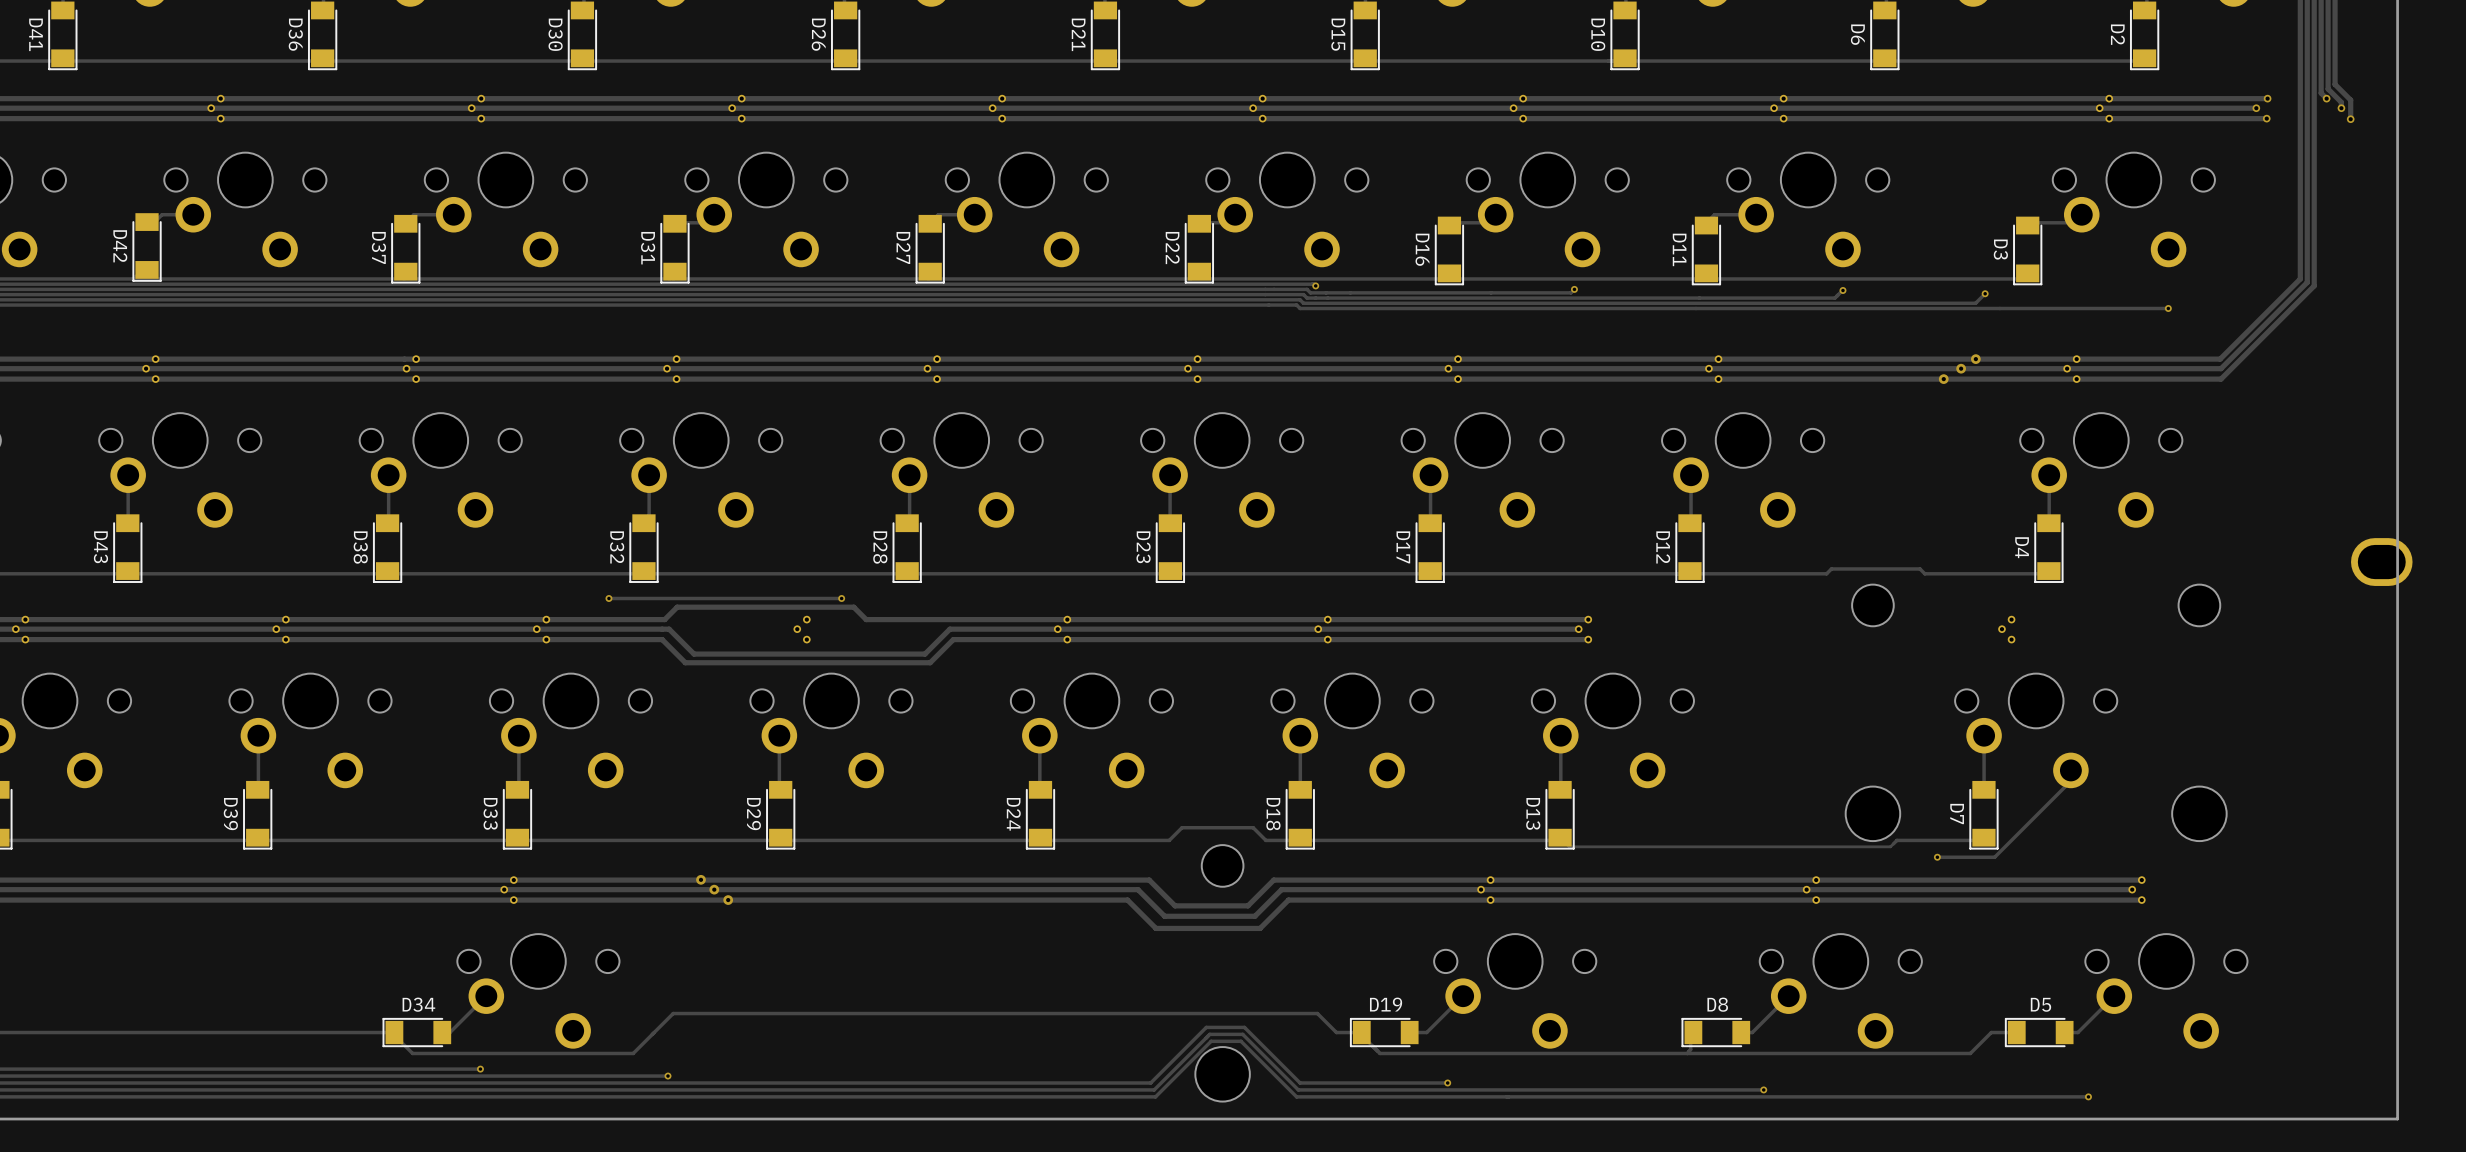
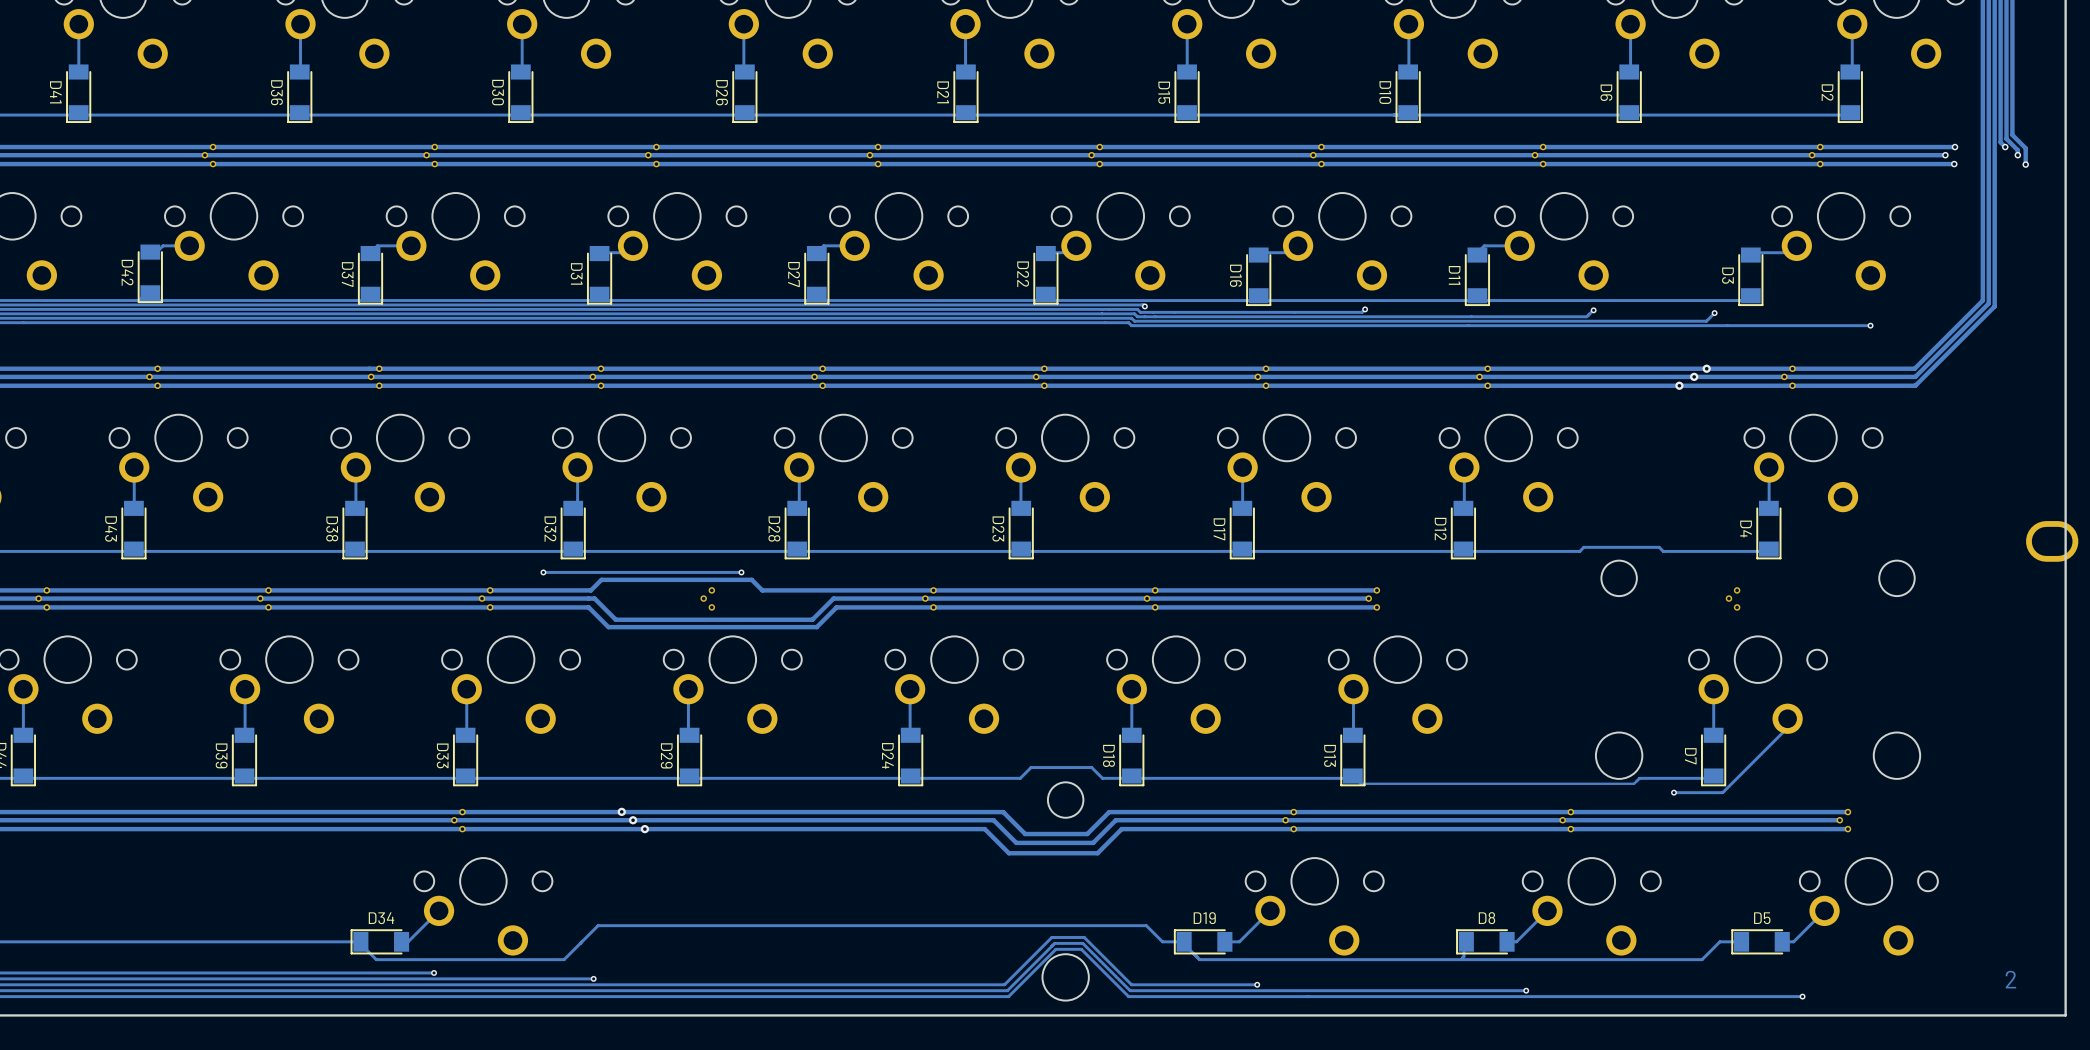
text: none -> 2 (2010, 979)

